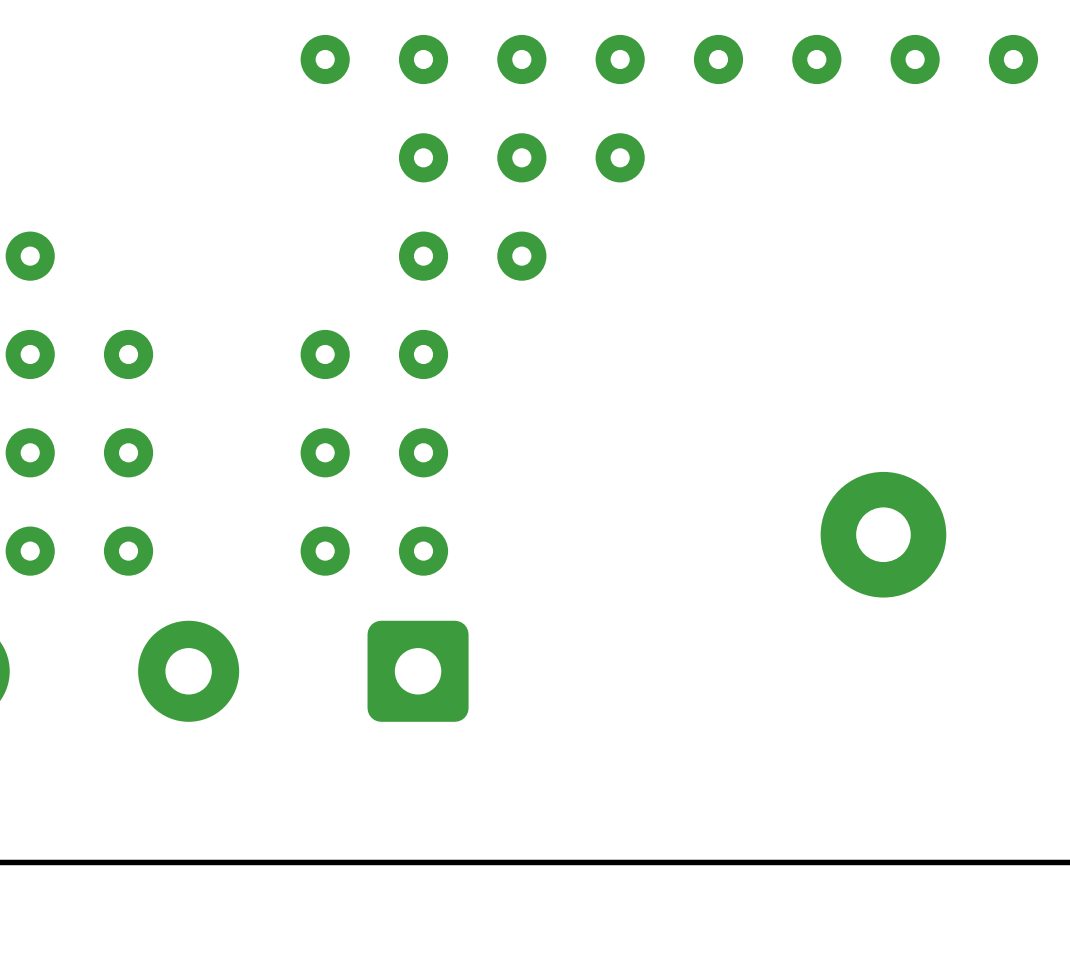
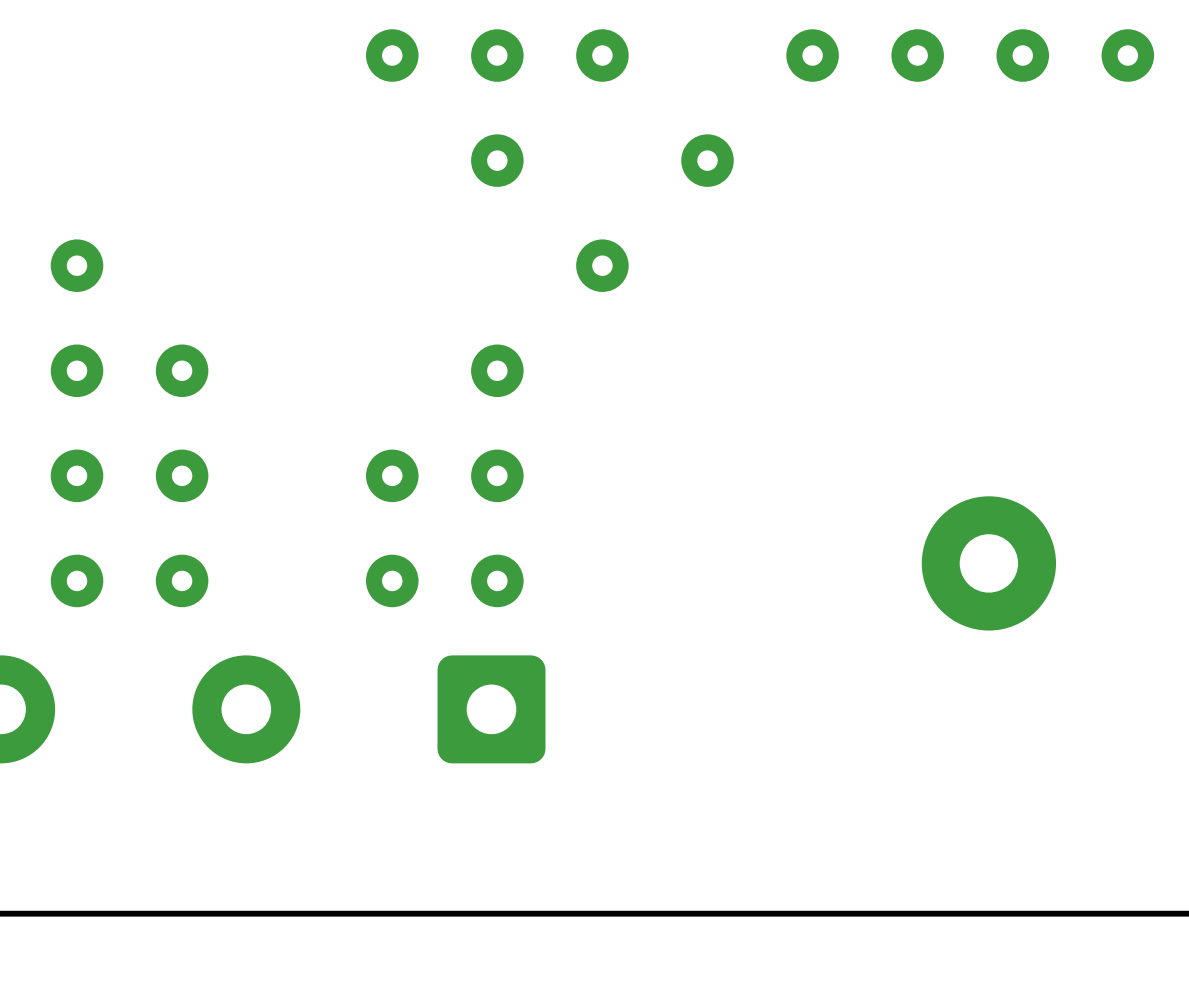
via: (620, 59) -> none
via: (521, 157) -> none
via: (423, 256) -> none
via: (325, 354) -> none

